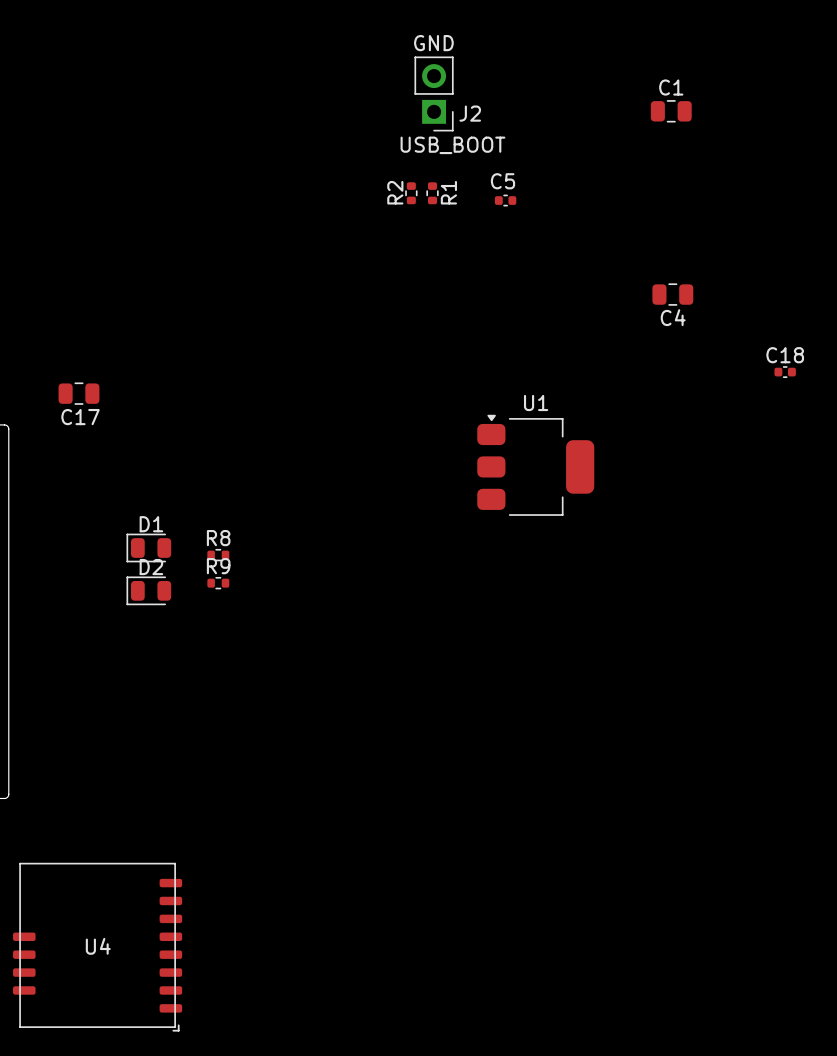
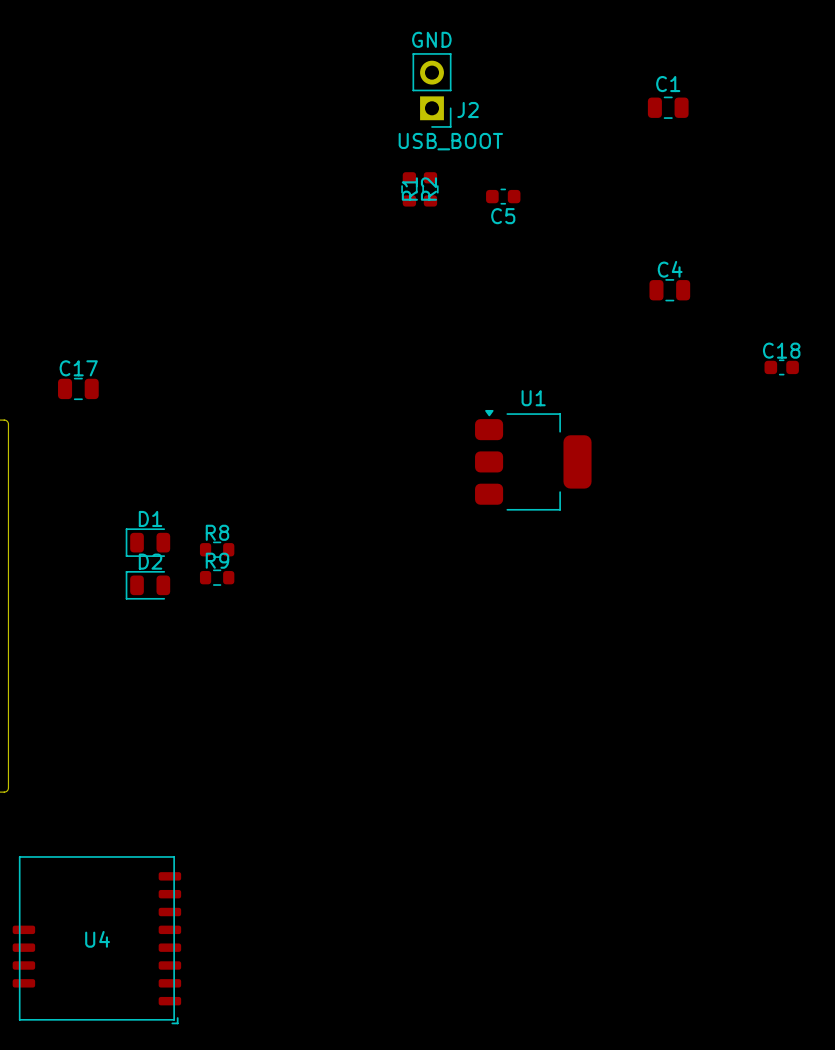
C5 name position: C5 (502, 181) -> C5 (503, 216)
R2 footprint: [405, 182, 418, 205] -> [401, 172, 418, 207]
R1 footprint: [426, 182, 439, 205] -> [422, 172, 439, 207]
R2 name position: R2 (395, 192) -> R2 (428, 189)
R1 name position: R1 (448, 192) -> R1 (409, 189)
C5 footprint: [494, 194, 517, 207] -> [486, 188, 521, 205]
C4 name position: C4 (673, 317) -> C4 (670, 269)
C18 footprint: [774, 366, 796, 379] -> [764, 359, 799, 376]
C17 name position: C17 (80, 417) -> C17 (78, 368)
R8 footprint: [207, 548, 230, 562] -> [199, 541, 235, 558]
R9 footprint: [207, 576, 230, 590] -> [199, 569, 235, 586]

